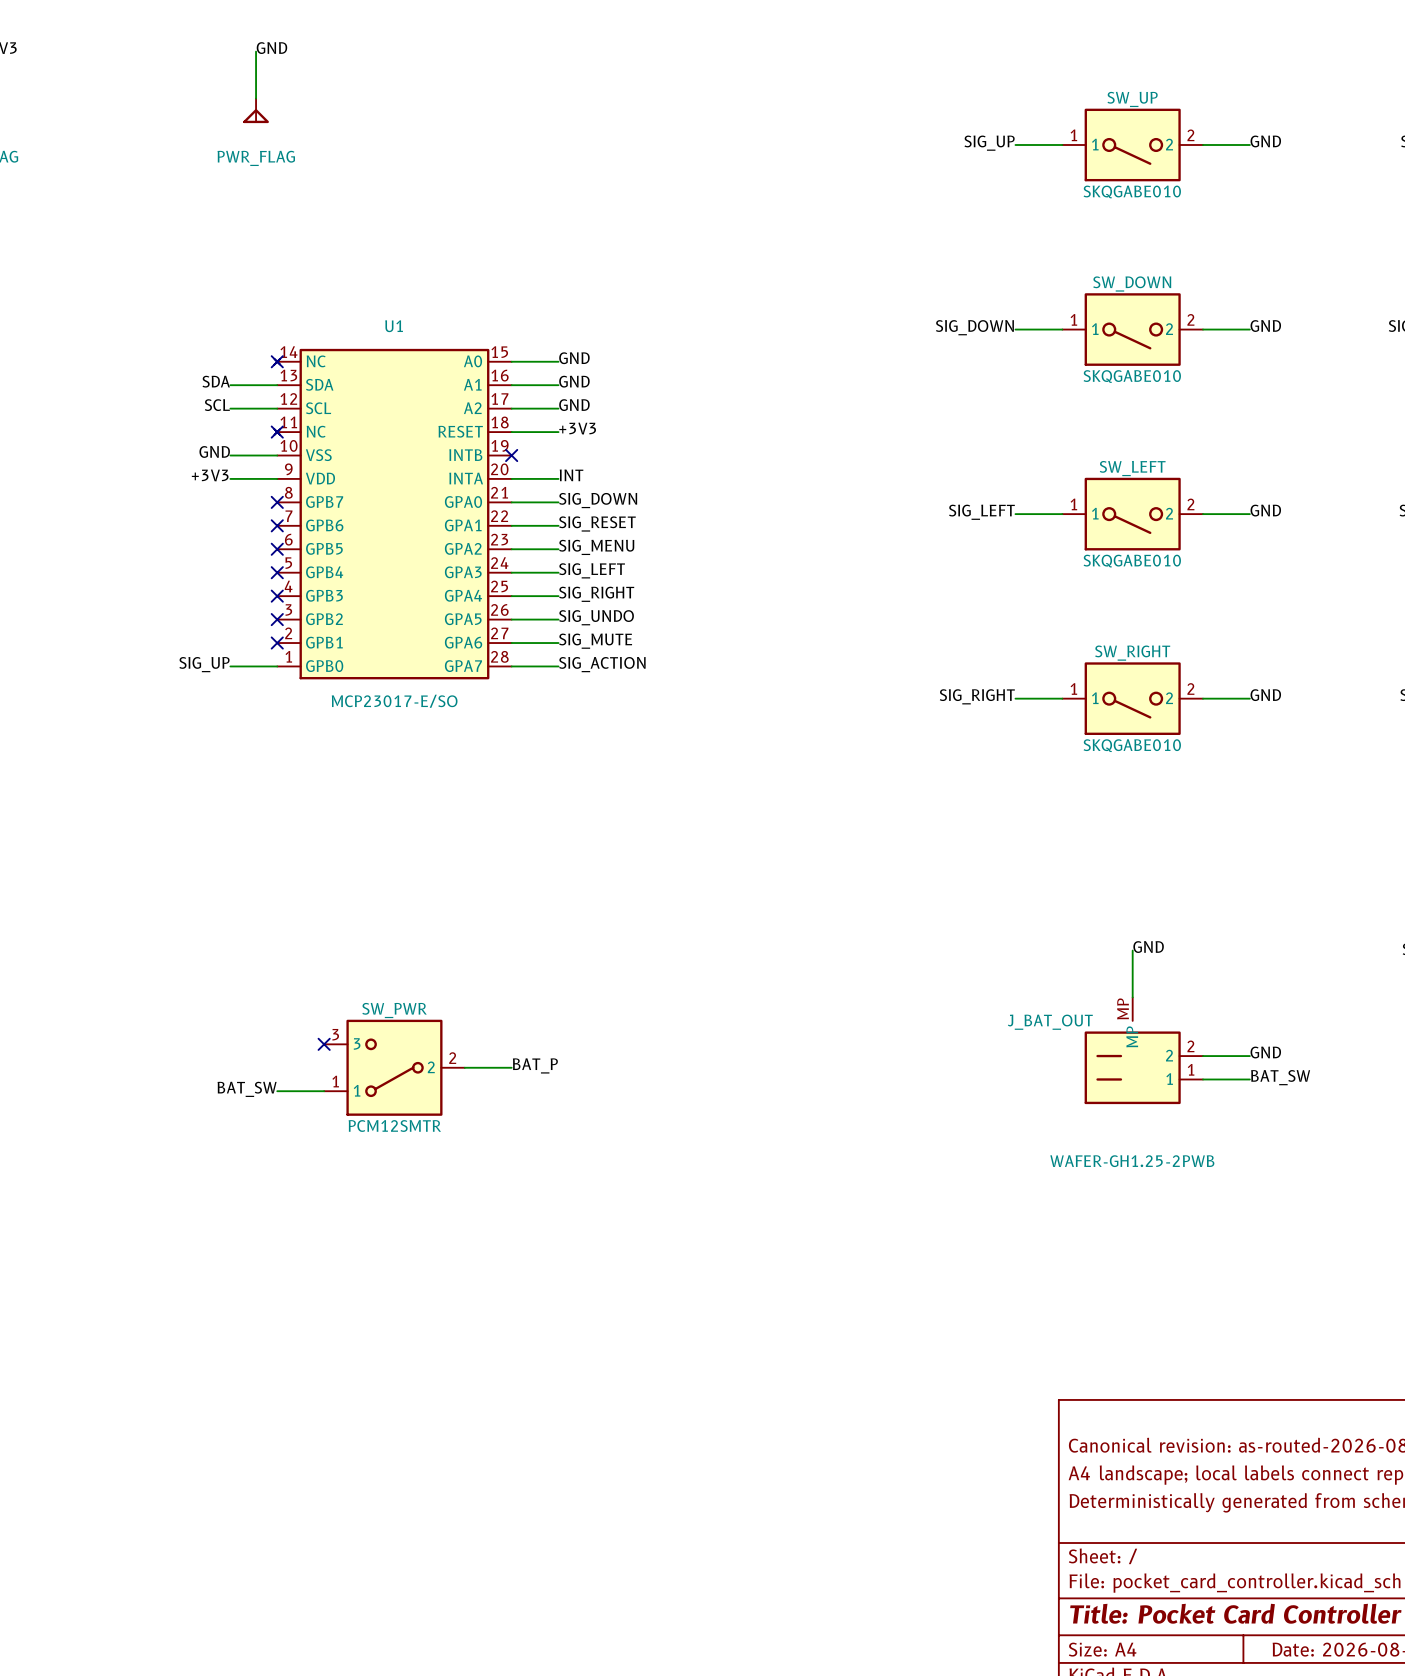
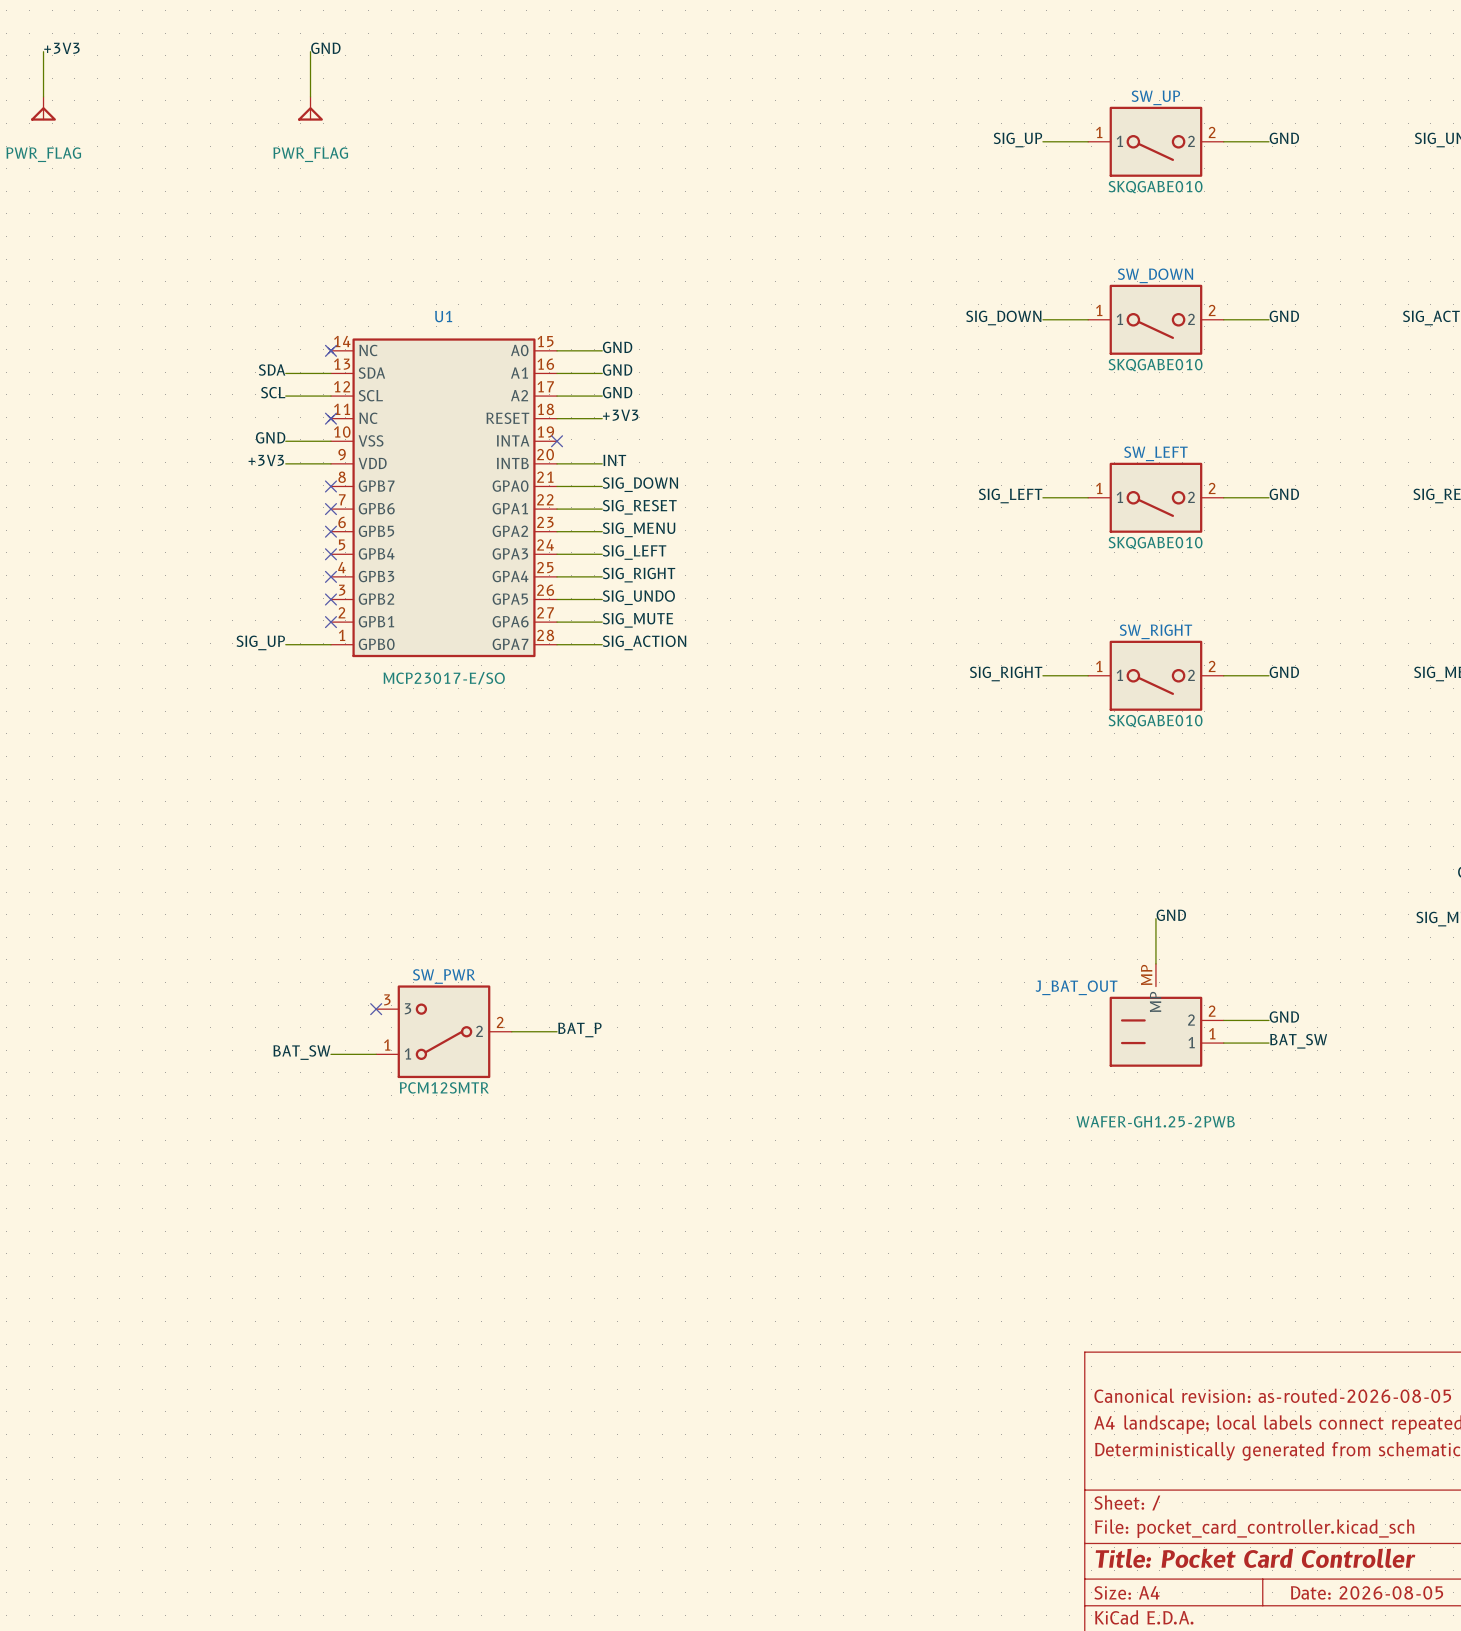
U1 pin name: INTB (465, 455) -> INTA (513, 440)
U1 pin name: INTA (466, 478) -> INTB (512, 463)

